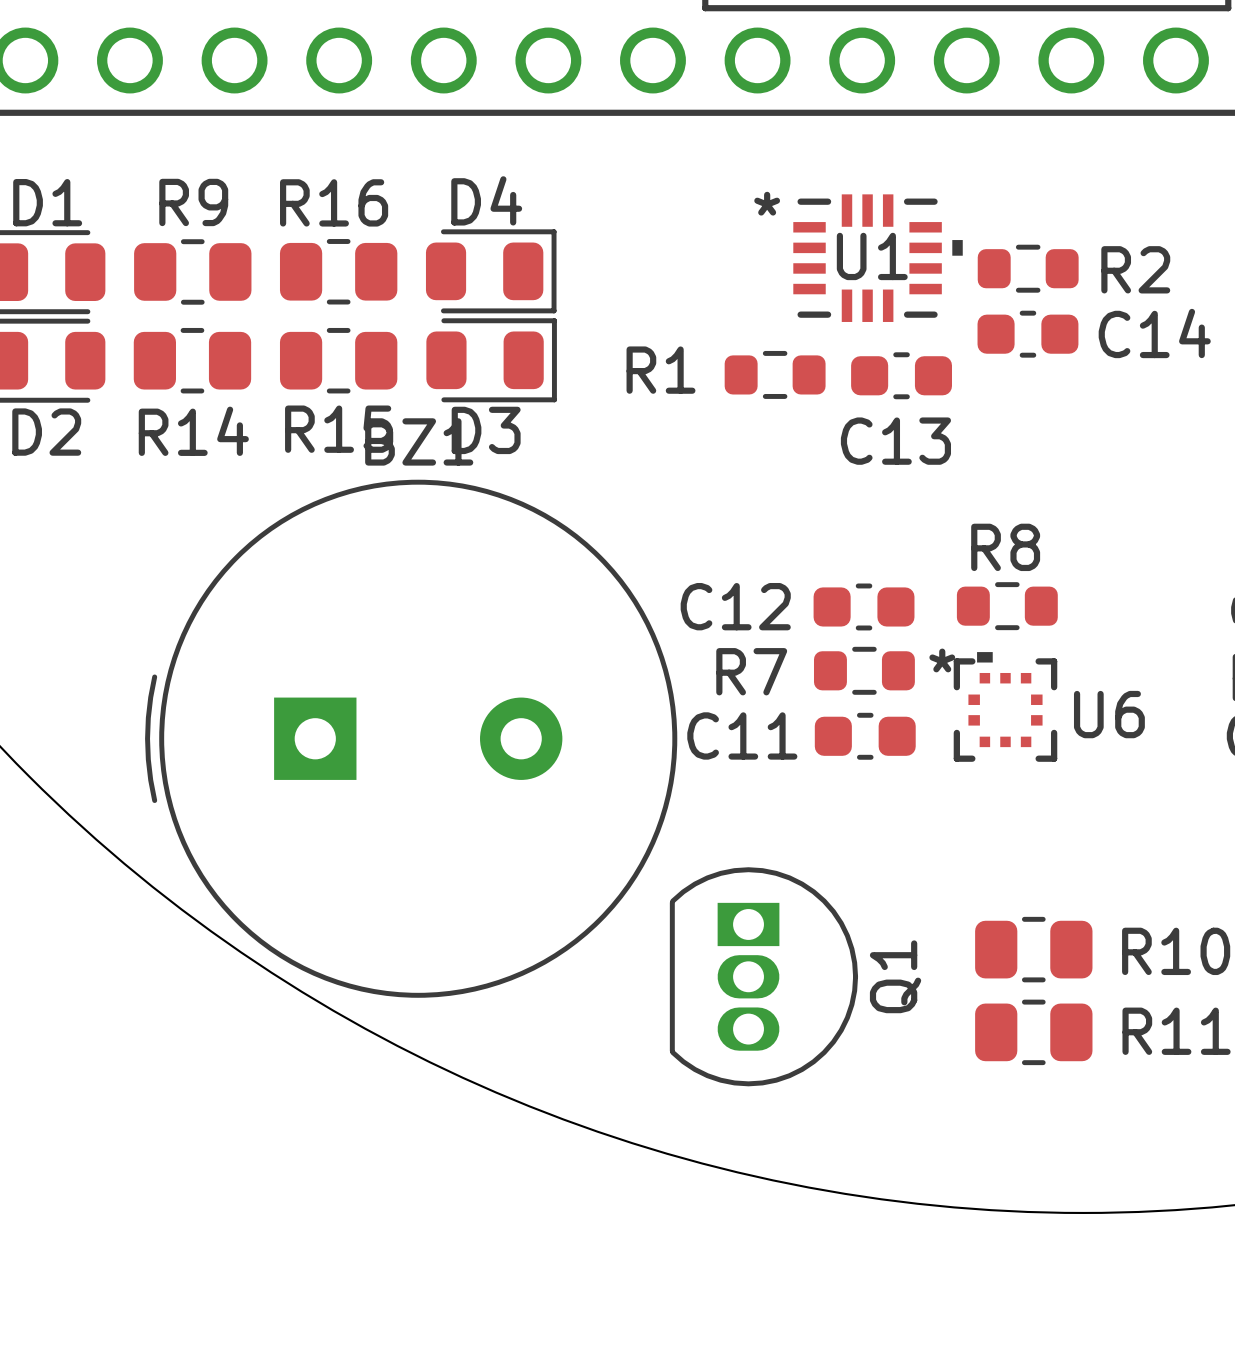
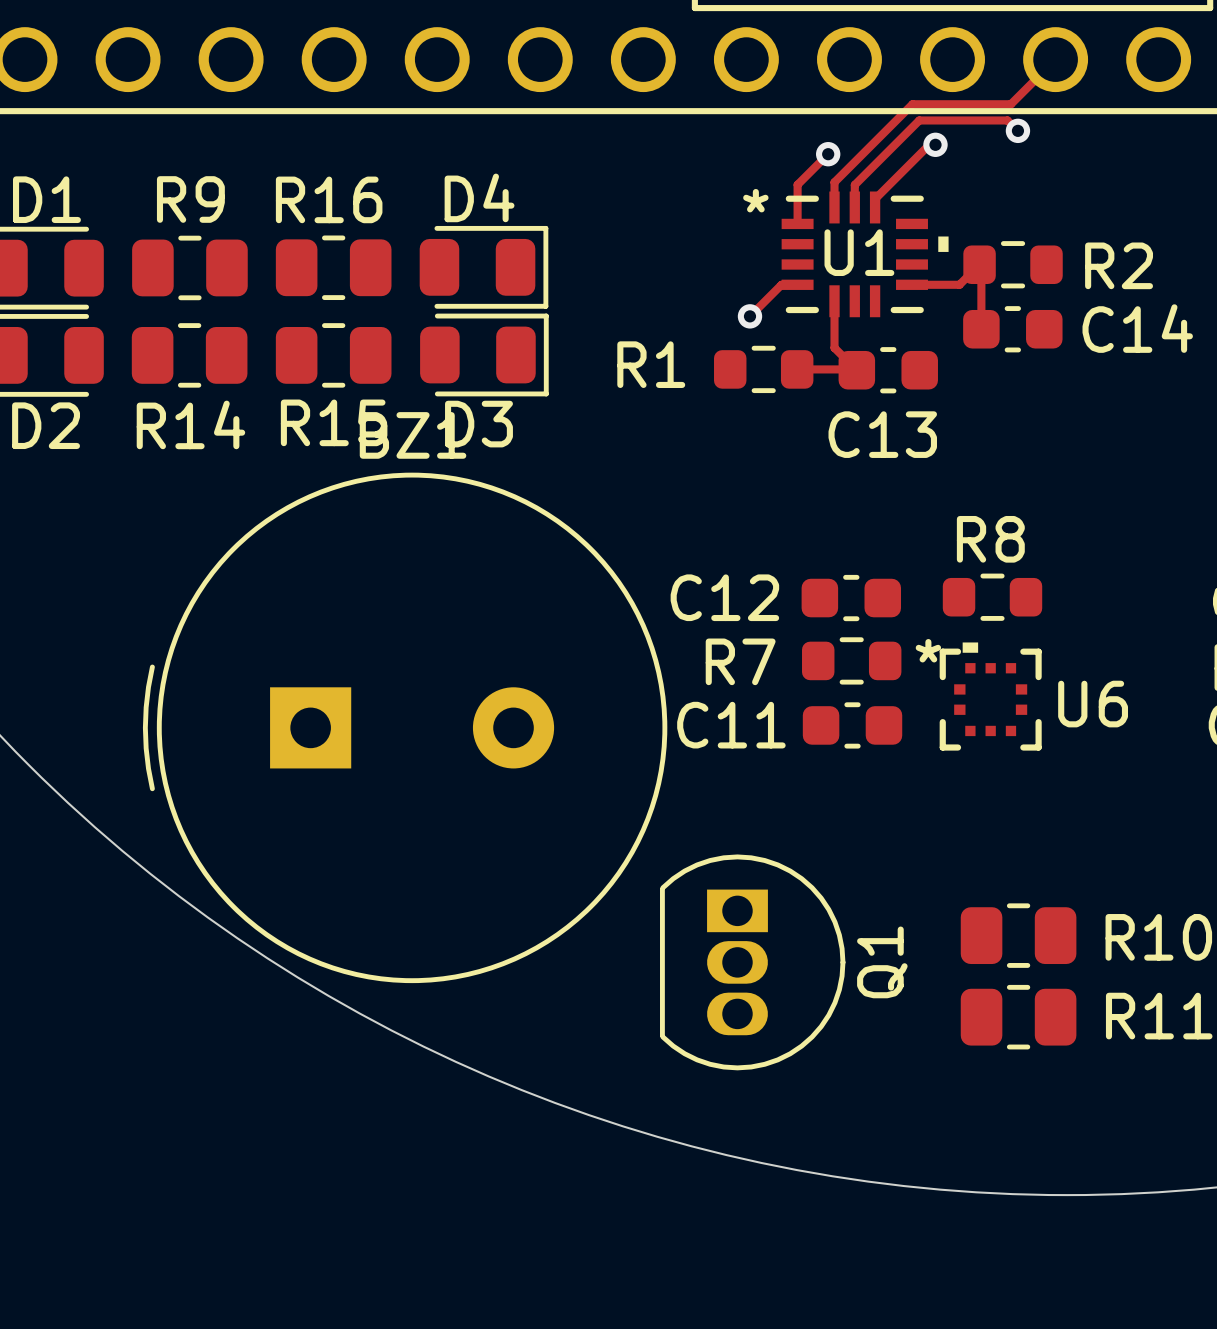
track: none -> (1055, 59) (1010, 104) (912, 104) (834, 182) (834, 207)
track: none -> (1017, 130) (1007, 120) (919, 120) (854, 184) (854, 207)
via: none -> (1017, 130)
track: none -> (935, 144) (929, 144) (875, 199) (875, 207)
via: none -> (935, 144)
track: none -> (828, 154) (797, 184) (797, 223)
via: none -> (828, 154)
track: none -> (797, 284) (781, 284) (749, 316)
track: none -> (911, 284) (959, 284) (979, 264) (981, 266) (981, 329)
track: none -> (834, 301) (834, 347) (856, 370)
via: none -> (749, 316)
track: none -> (797, 369) (856, 369)

